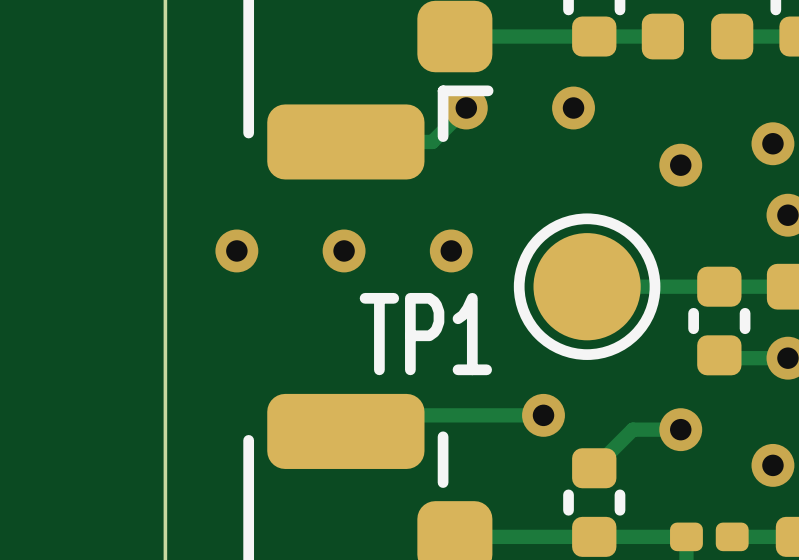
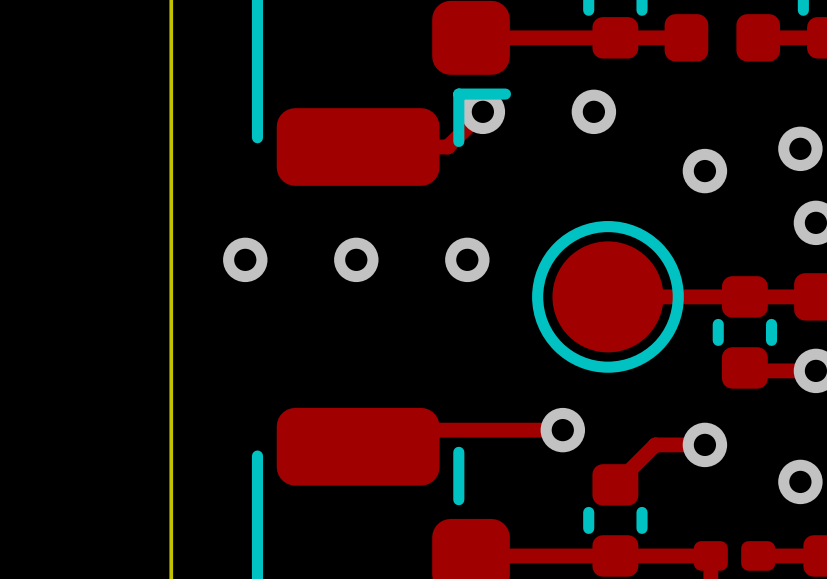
TP1 name: TP1 (425, 334) -> none

